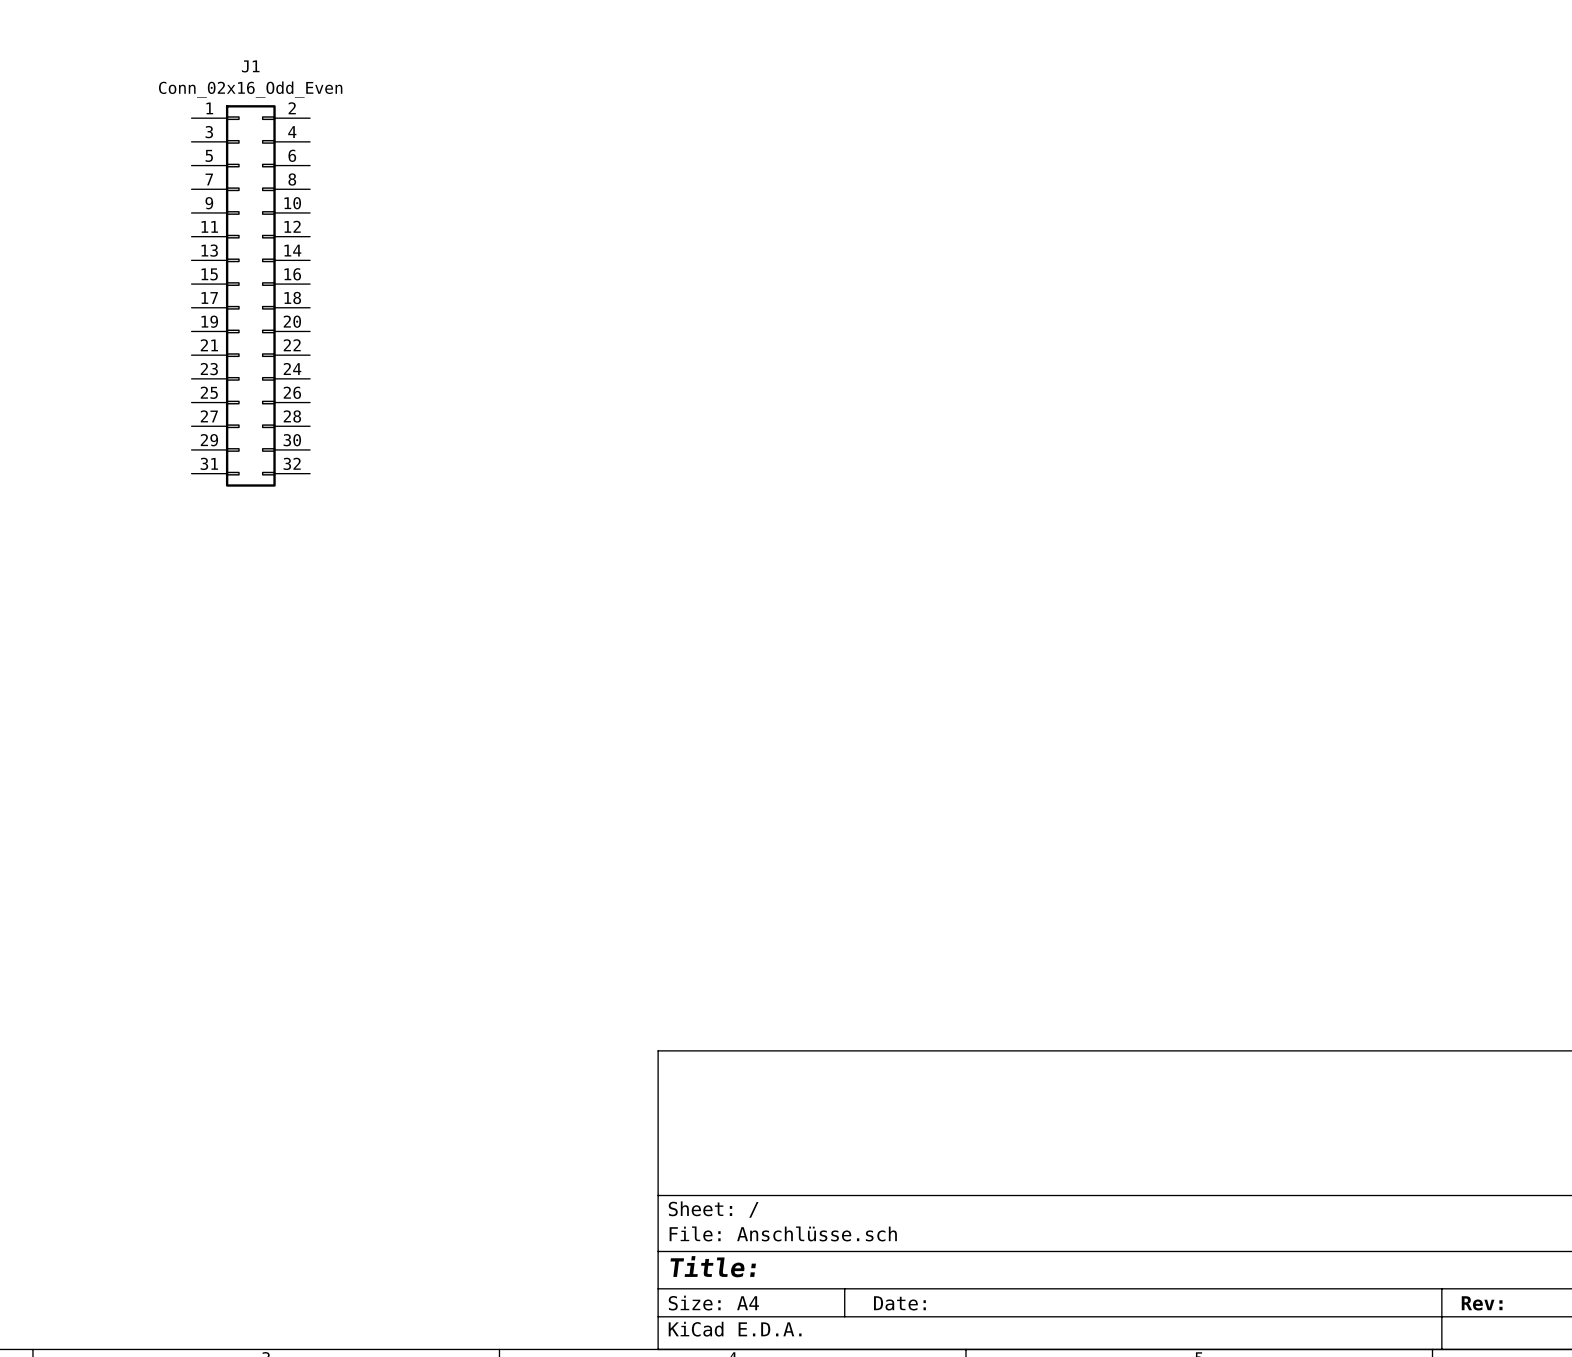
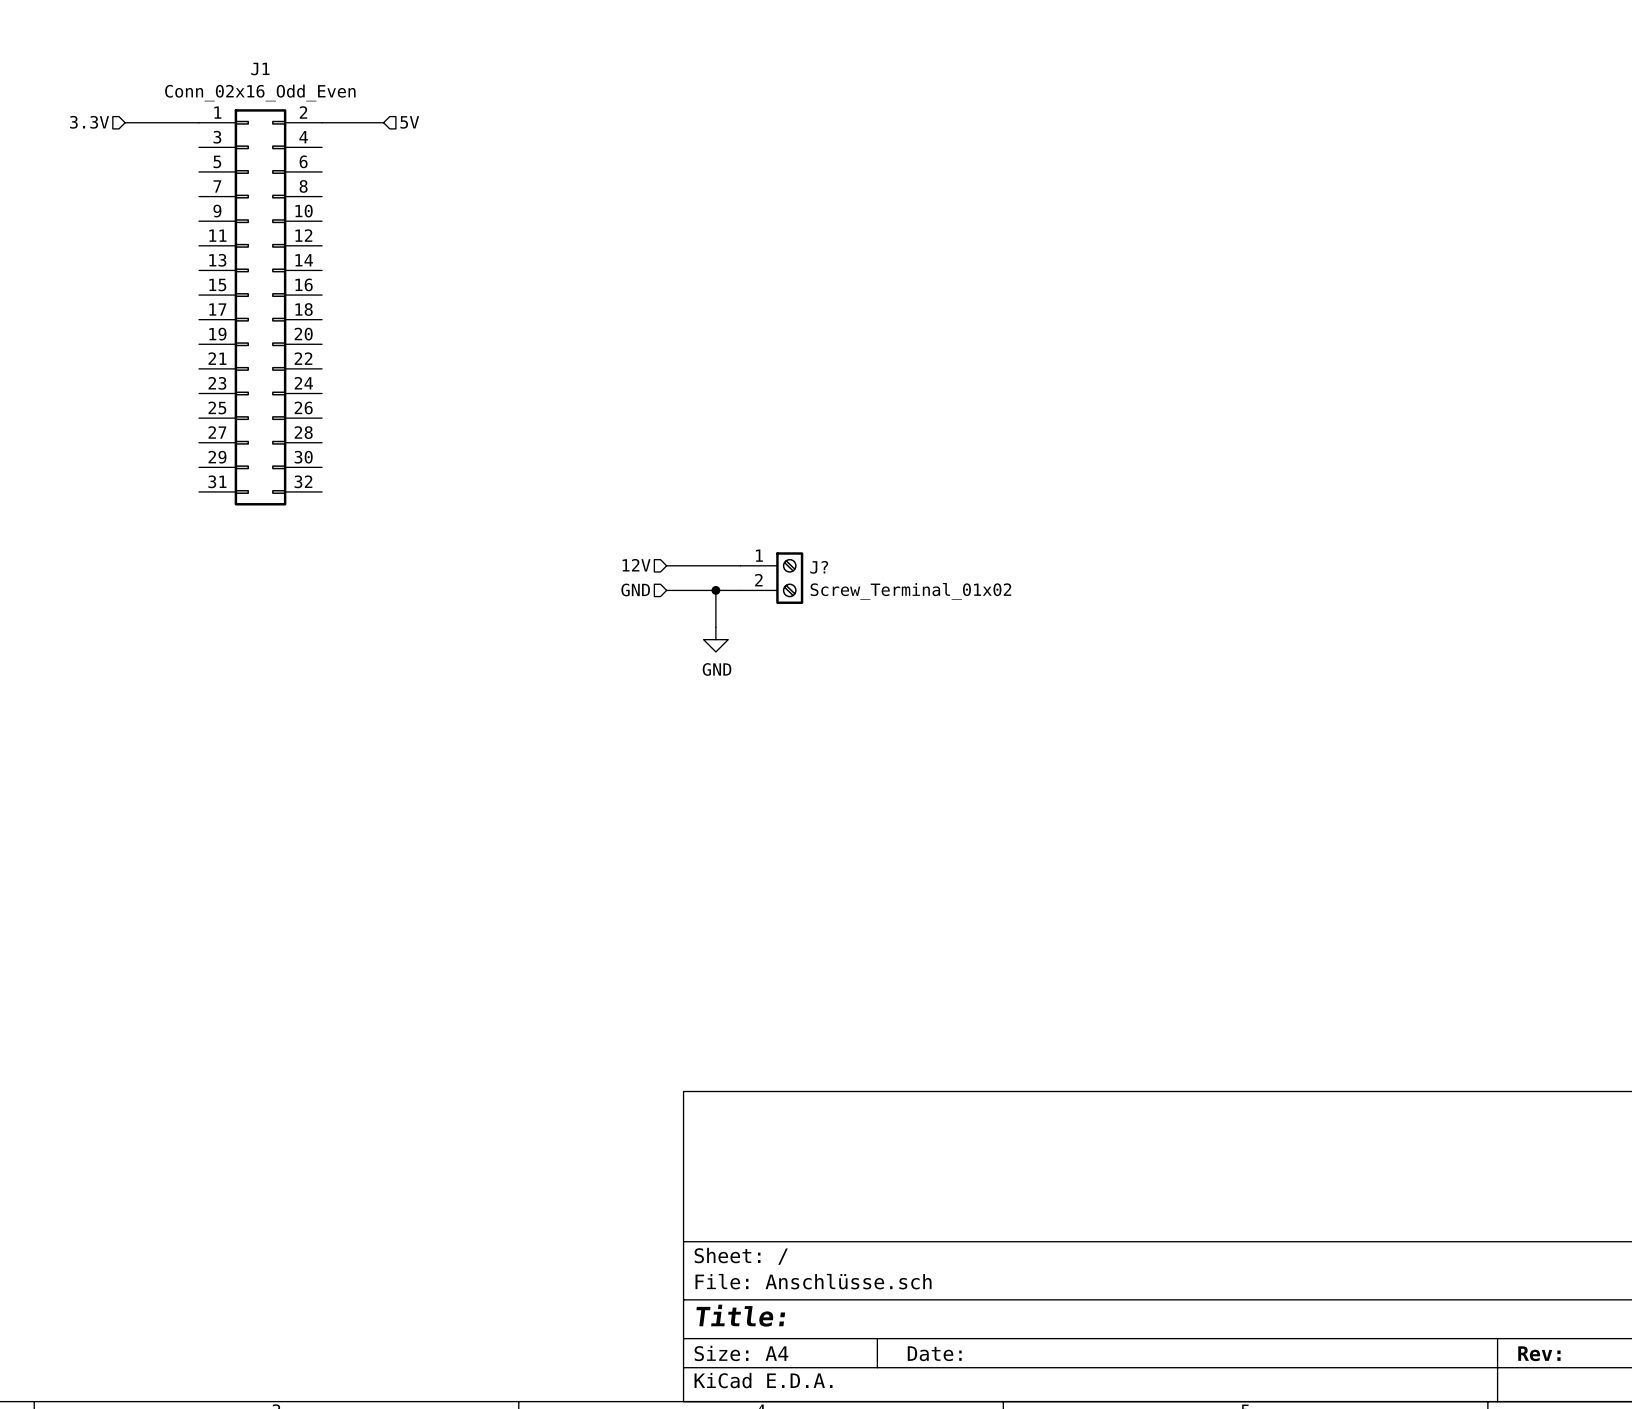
hierarchical label: none -> 3.3V (89, 122)
hierarchical label: none -> 5V (409, 122)
wire: none -> (125, 122) (198, 122)
wire: none -> (322, 122) (383, 122)
hierarchical label: none -> 12V (636, 565)
wire: none -> (666, 565) (740, 565)
J?: none -> Screw_Terminal_01x02 (771, 578)
hierarchical label: none -> GND (635, 589)
wire: none -> (666, 590) (740, 590)
wire: none -> (715, 590) (715, 627)
junction: none -> (715, 590)
power symbol: none -> GND (715, 639)

